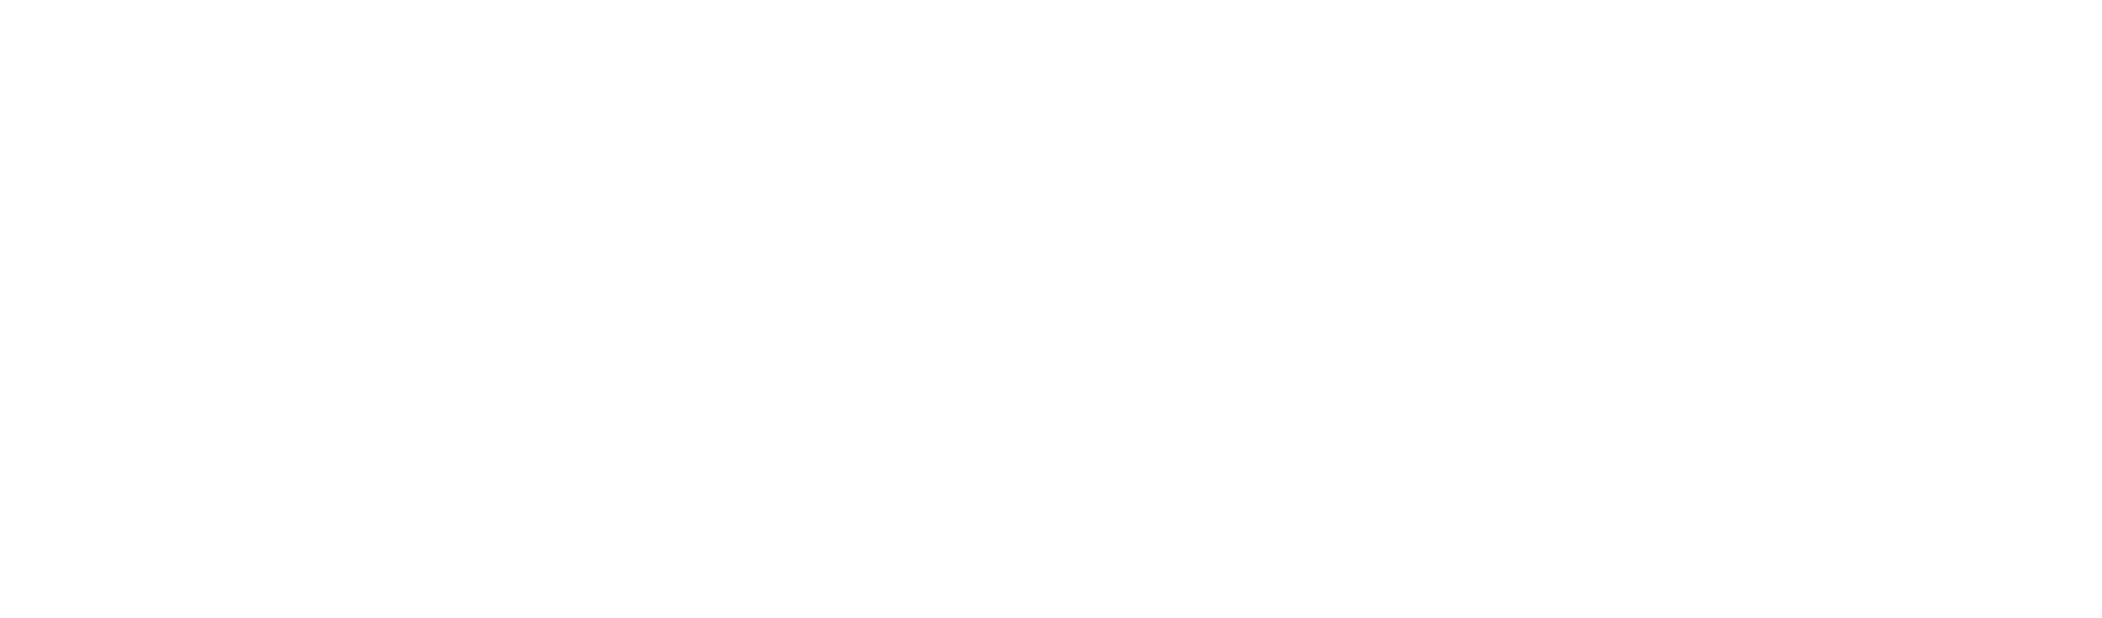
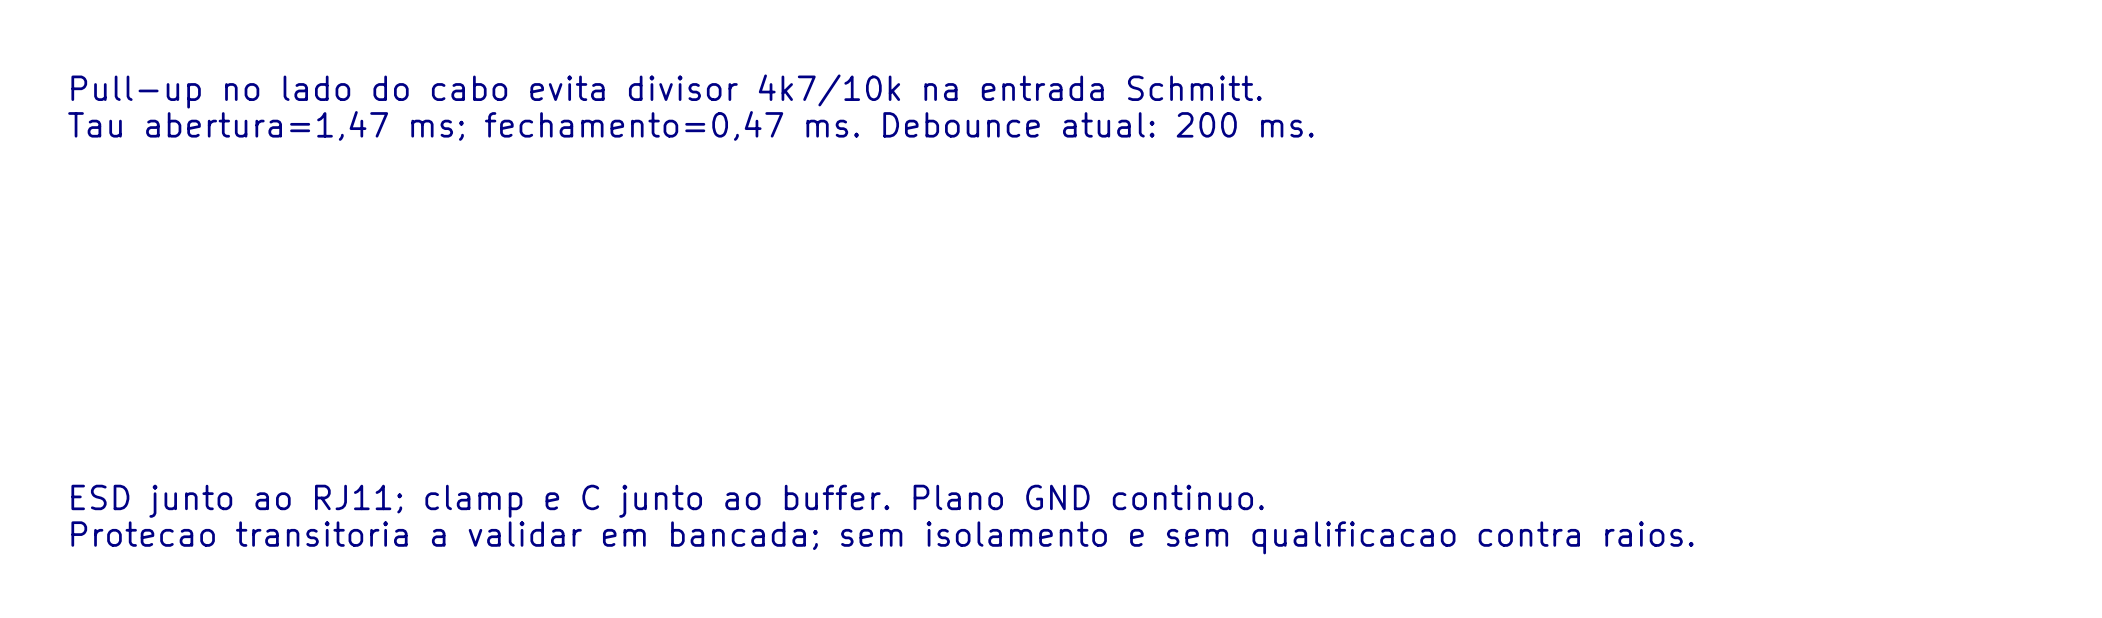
text: none -> Pull-up no lado do cabo evita divisor 4k7/10k na entrada Schmitt. (666, 91)
text: none -> Tau abertura=1,47 ms; fechamento=0,47 ms. Debounce atual: 200 ms. (690, 125)
text: none -> ESD junto ao RJ11; clamp e C junto ao buffer. Plano GND continuo. (667, 501)
text: none -> Protecao transitoria a validar em bancada; sem isolamento e sem qualificacao contra raios. (882, 537)

